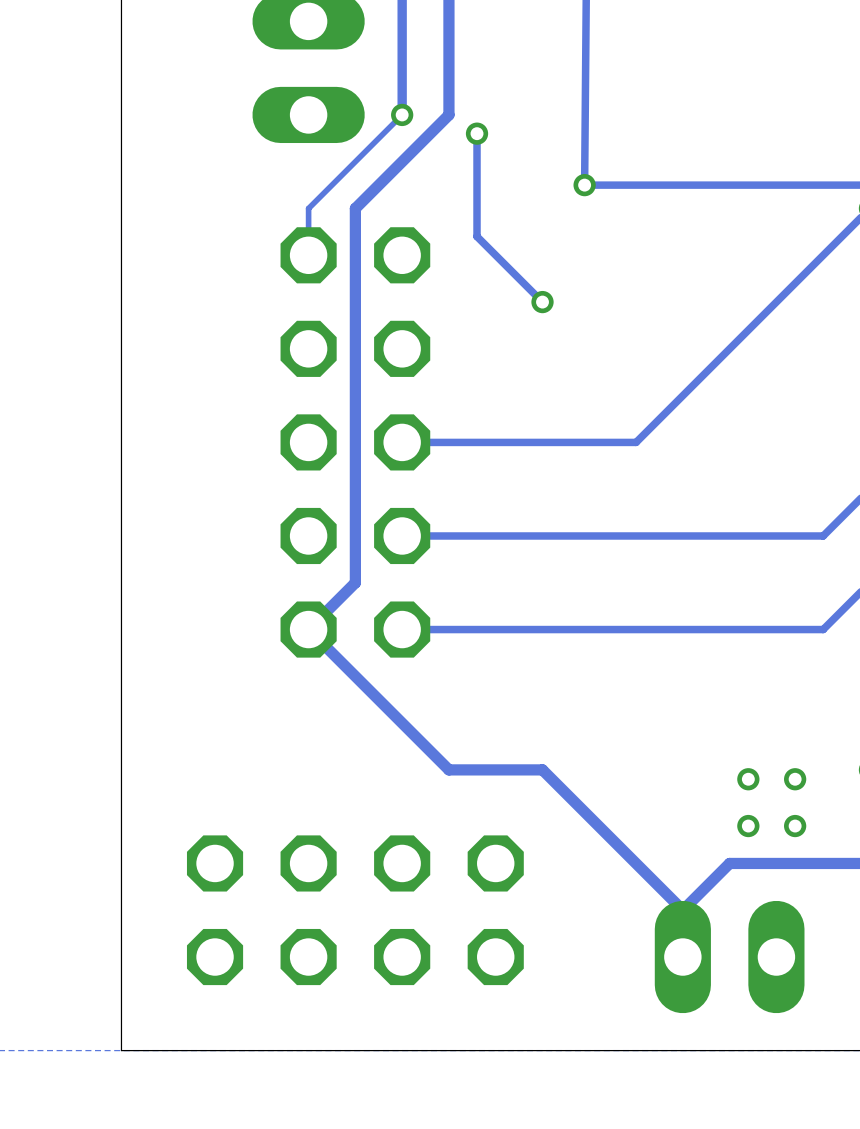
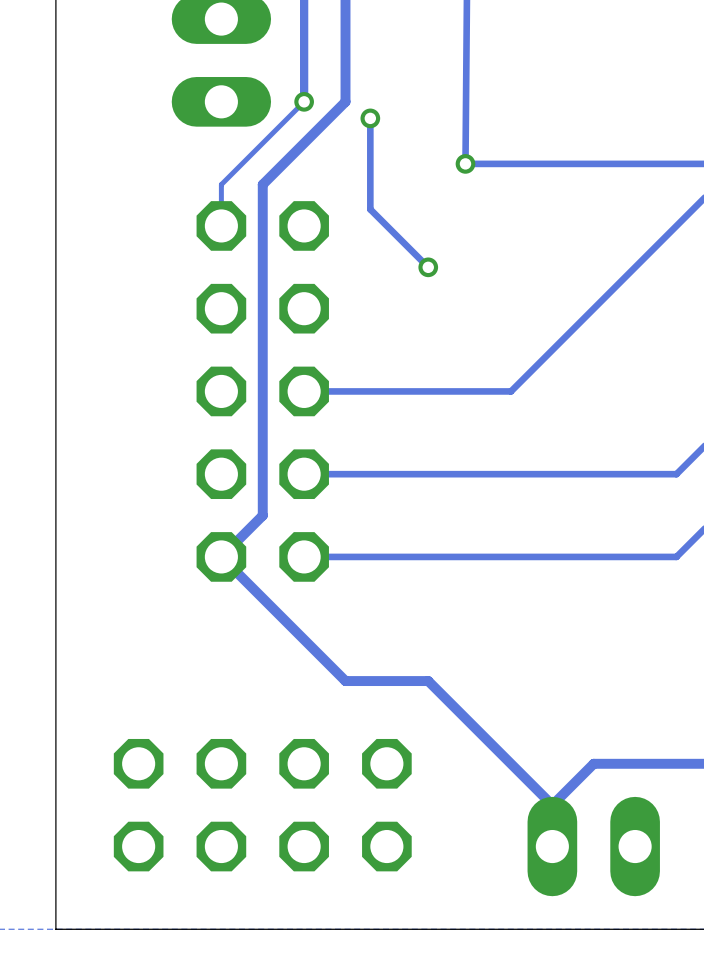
via: (748, 779) -> none
via: (795, 779) -> none
via: (748, 826) -> none
via: (795, 826) -> none

